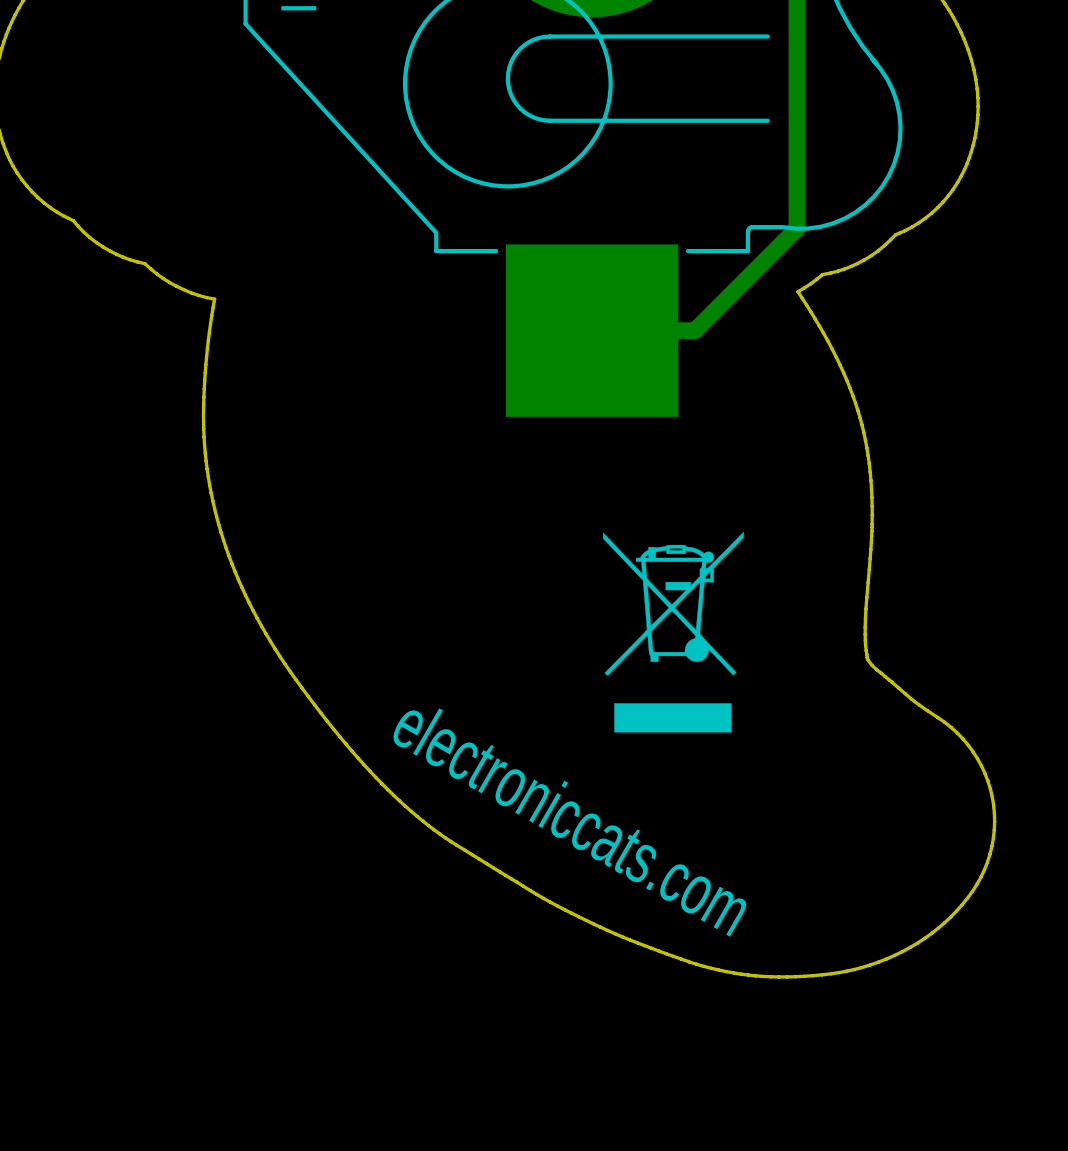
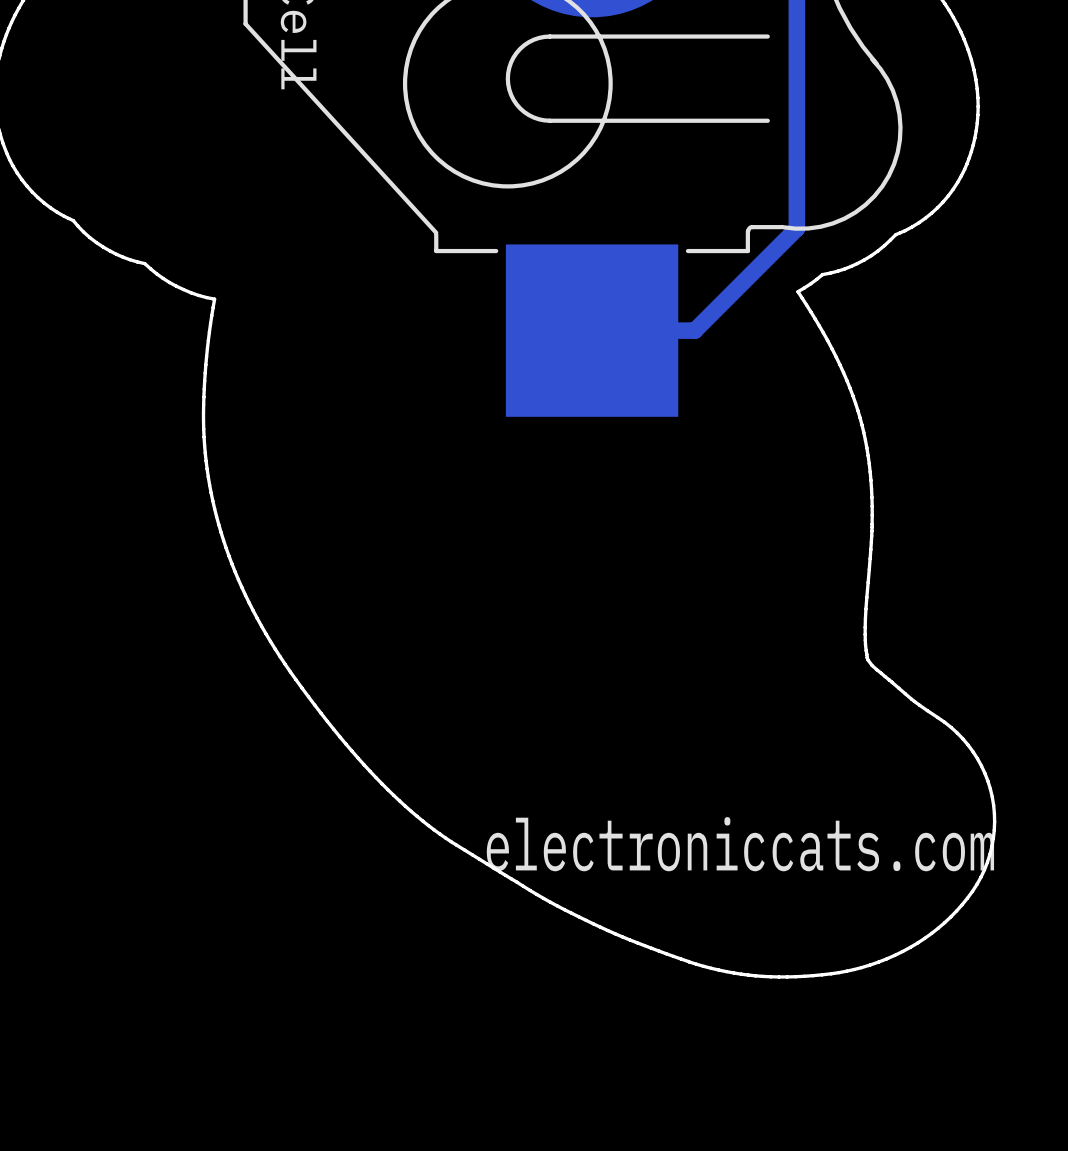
drawing: [603, 531, 744, 733] -> none
text rotation: 0° (569, 822) -> 30° counterclockwise (740, 844)

